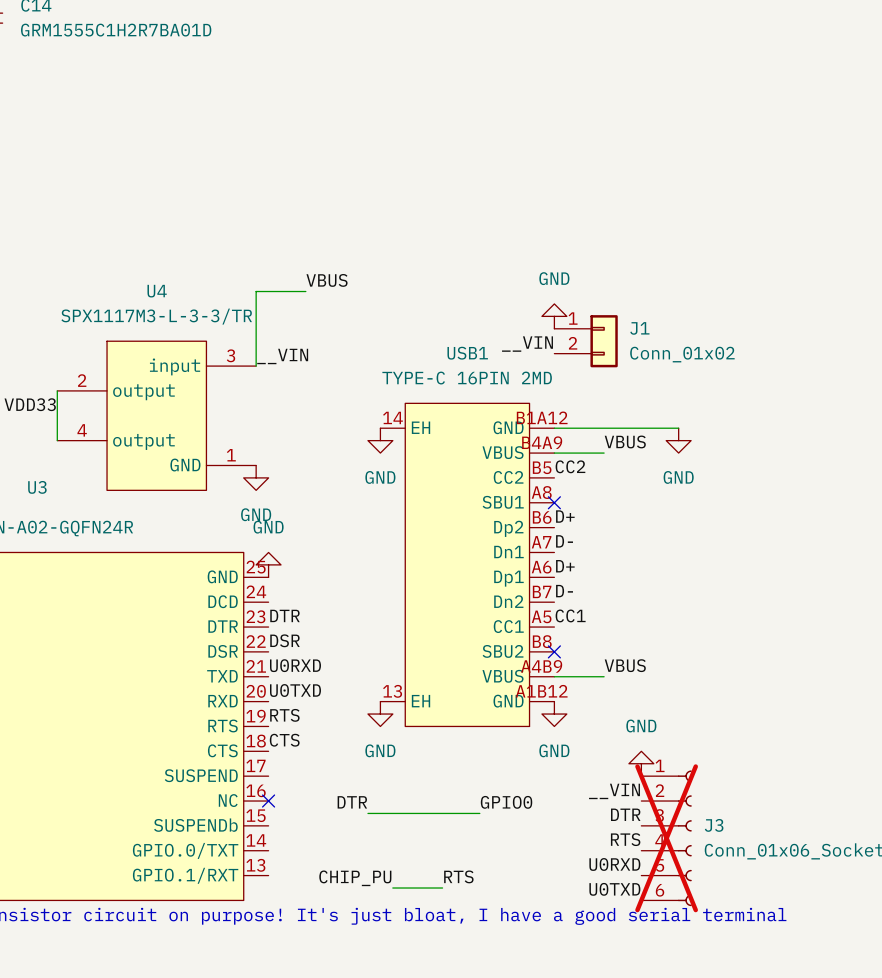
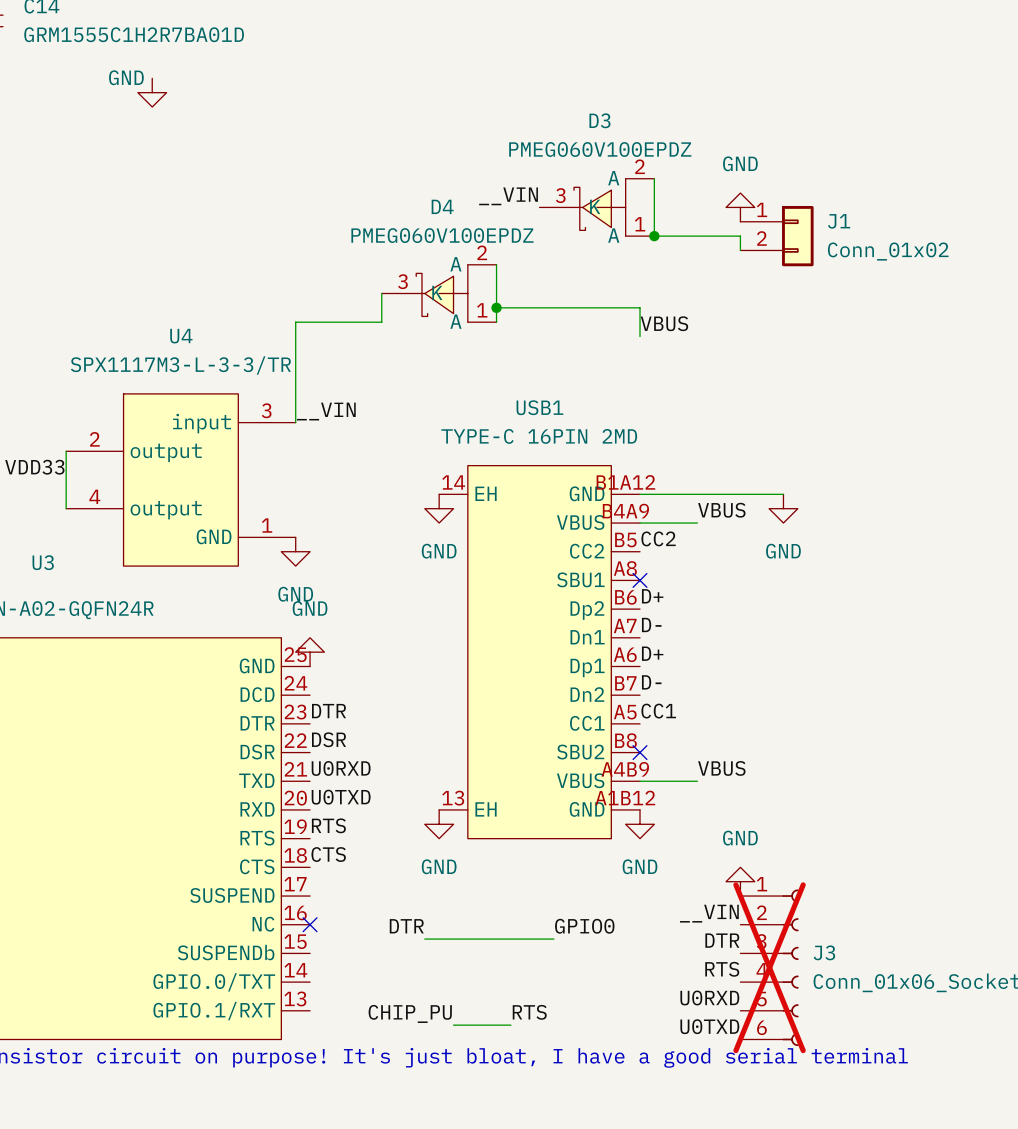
power symbol: none -> GND (152, 92)
wire: none -> (654, 178) (654, 236) (740, 236) (740, 250)
D3: none -> PMEG060V100EPDZ (596, 207)
junction: none -> (654, 236)
wire: none -> (496, 264) (496, 322)
D4: none -> PMEG060V100EPDZ (439, 293)
wire: none -> (496, 307) (640, 307) (640, 336)
junction: none -> (496, 307)
label: VBUS (327, 280) -> none
label: none -> VBUS (664, 323)
wire: (256, 291) (305, 291) -> (295, 336) (295, 322) (381, 322) (381, 293)
power symbol position: GND (554, 316) -> GND (740, 207)
J1 position: (586, 341) -> (777, 236)
label position: __VIN (527, 344) -> __VIN (508, 196)

